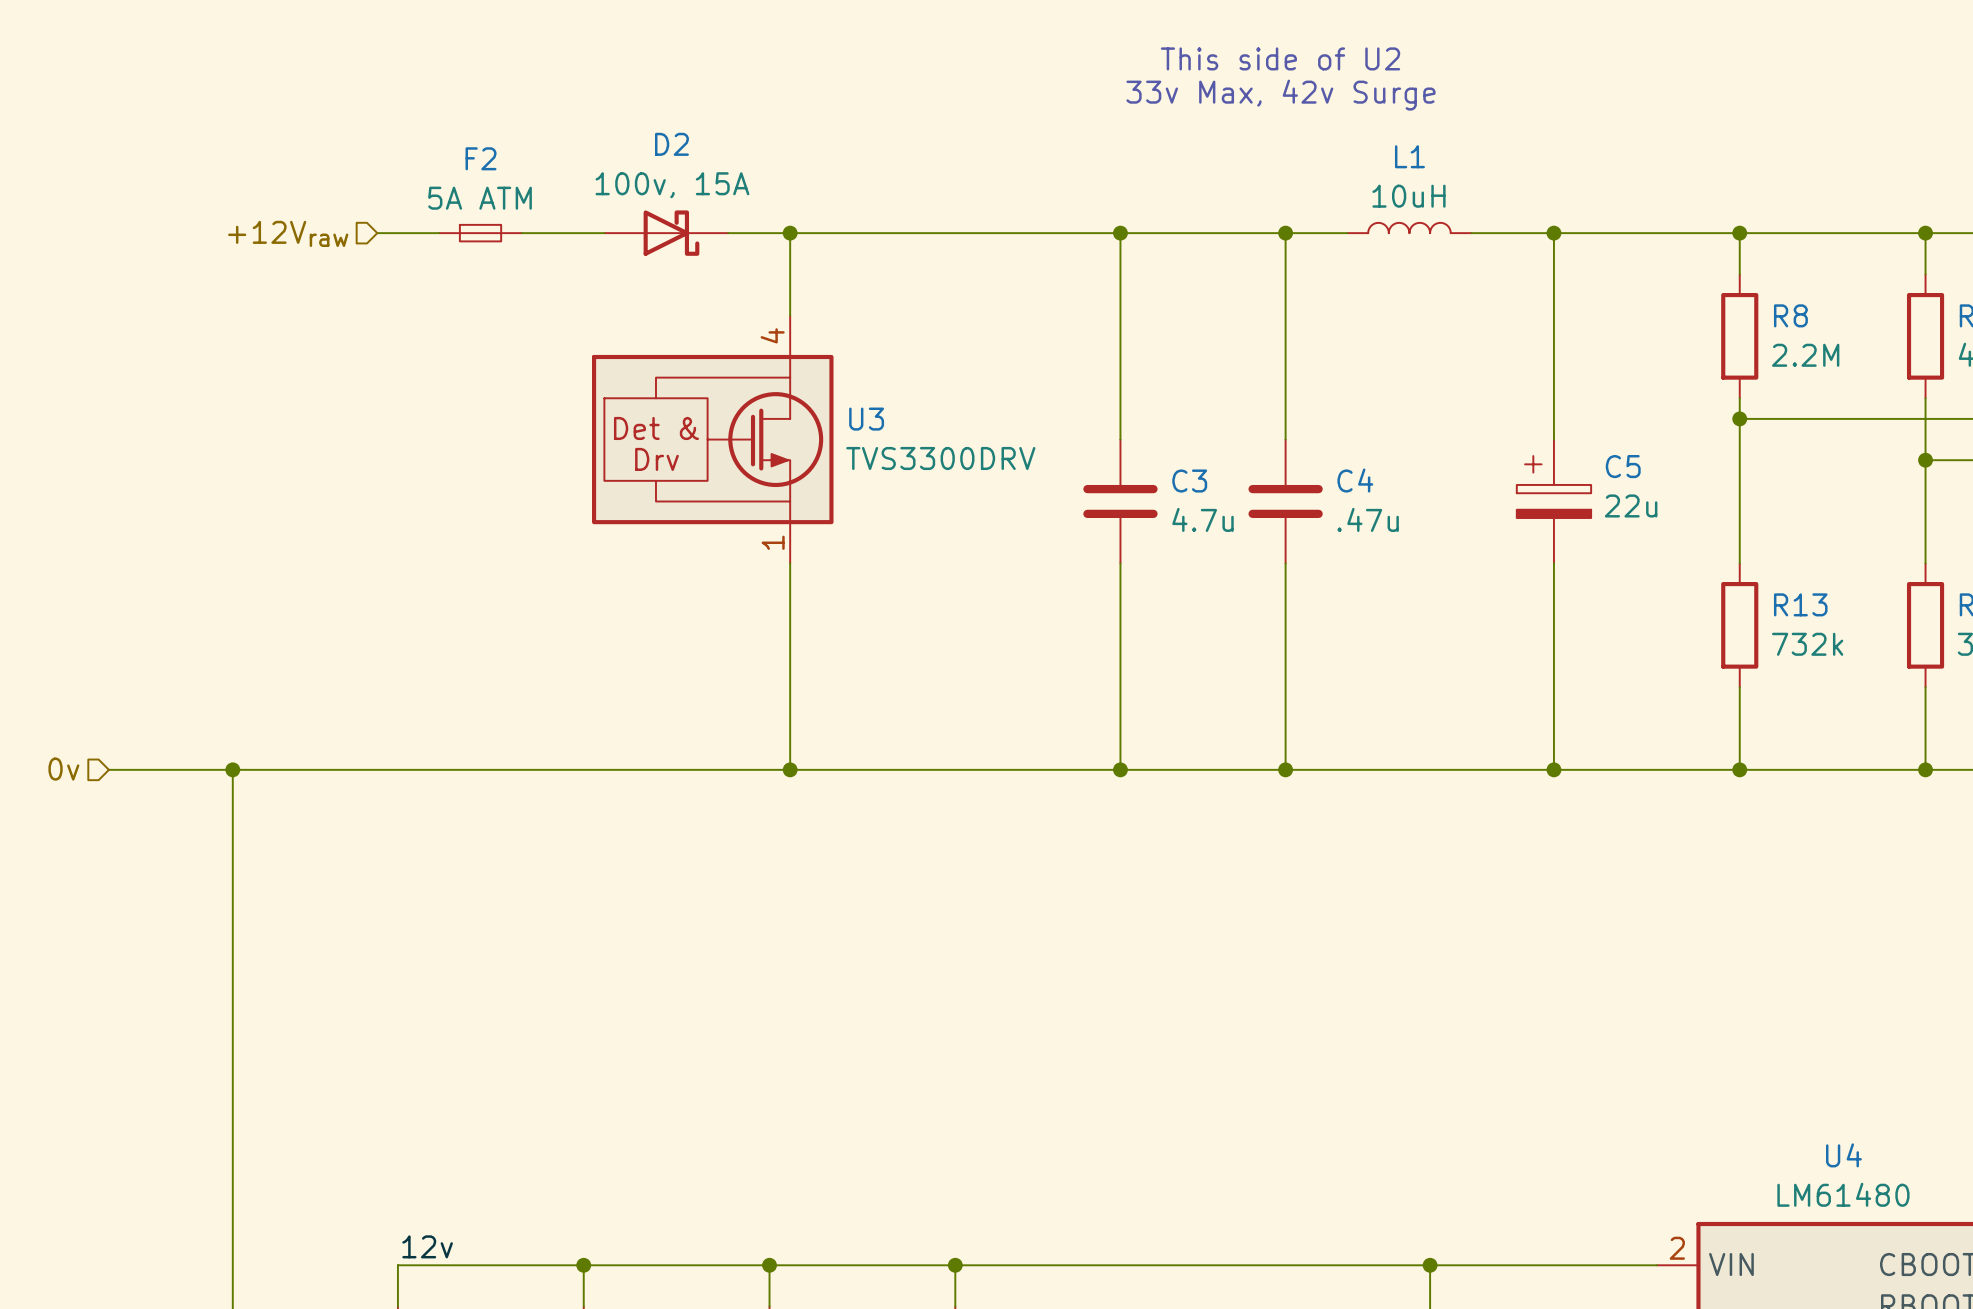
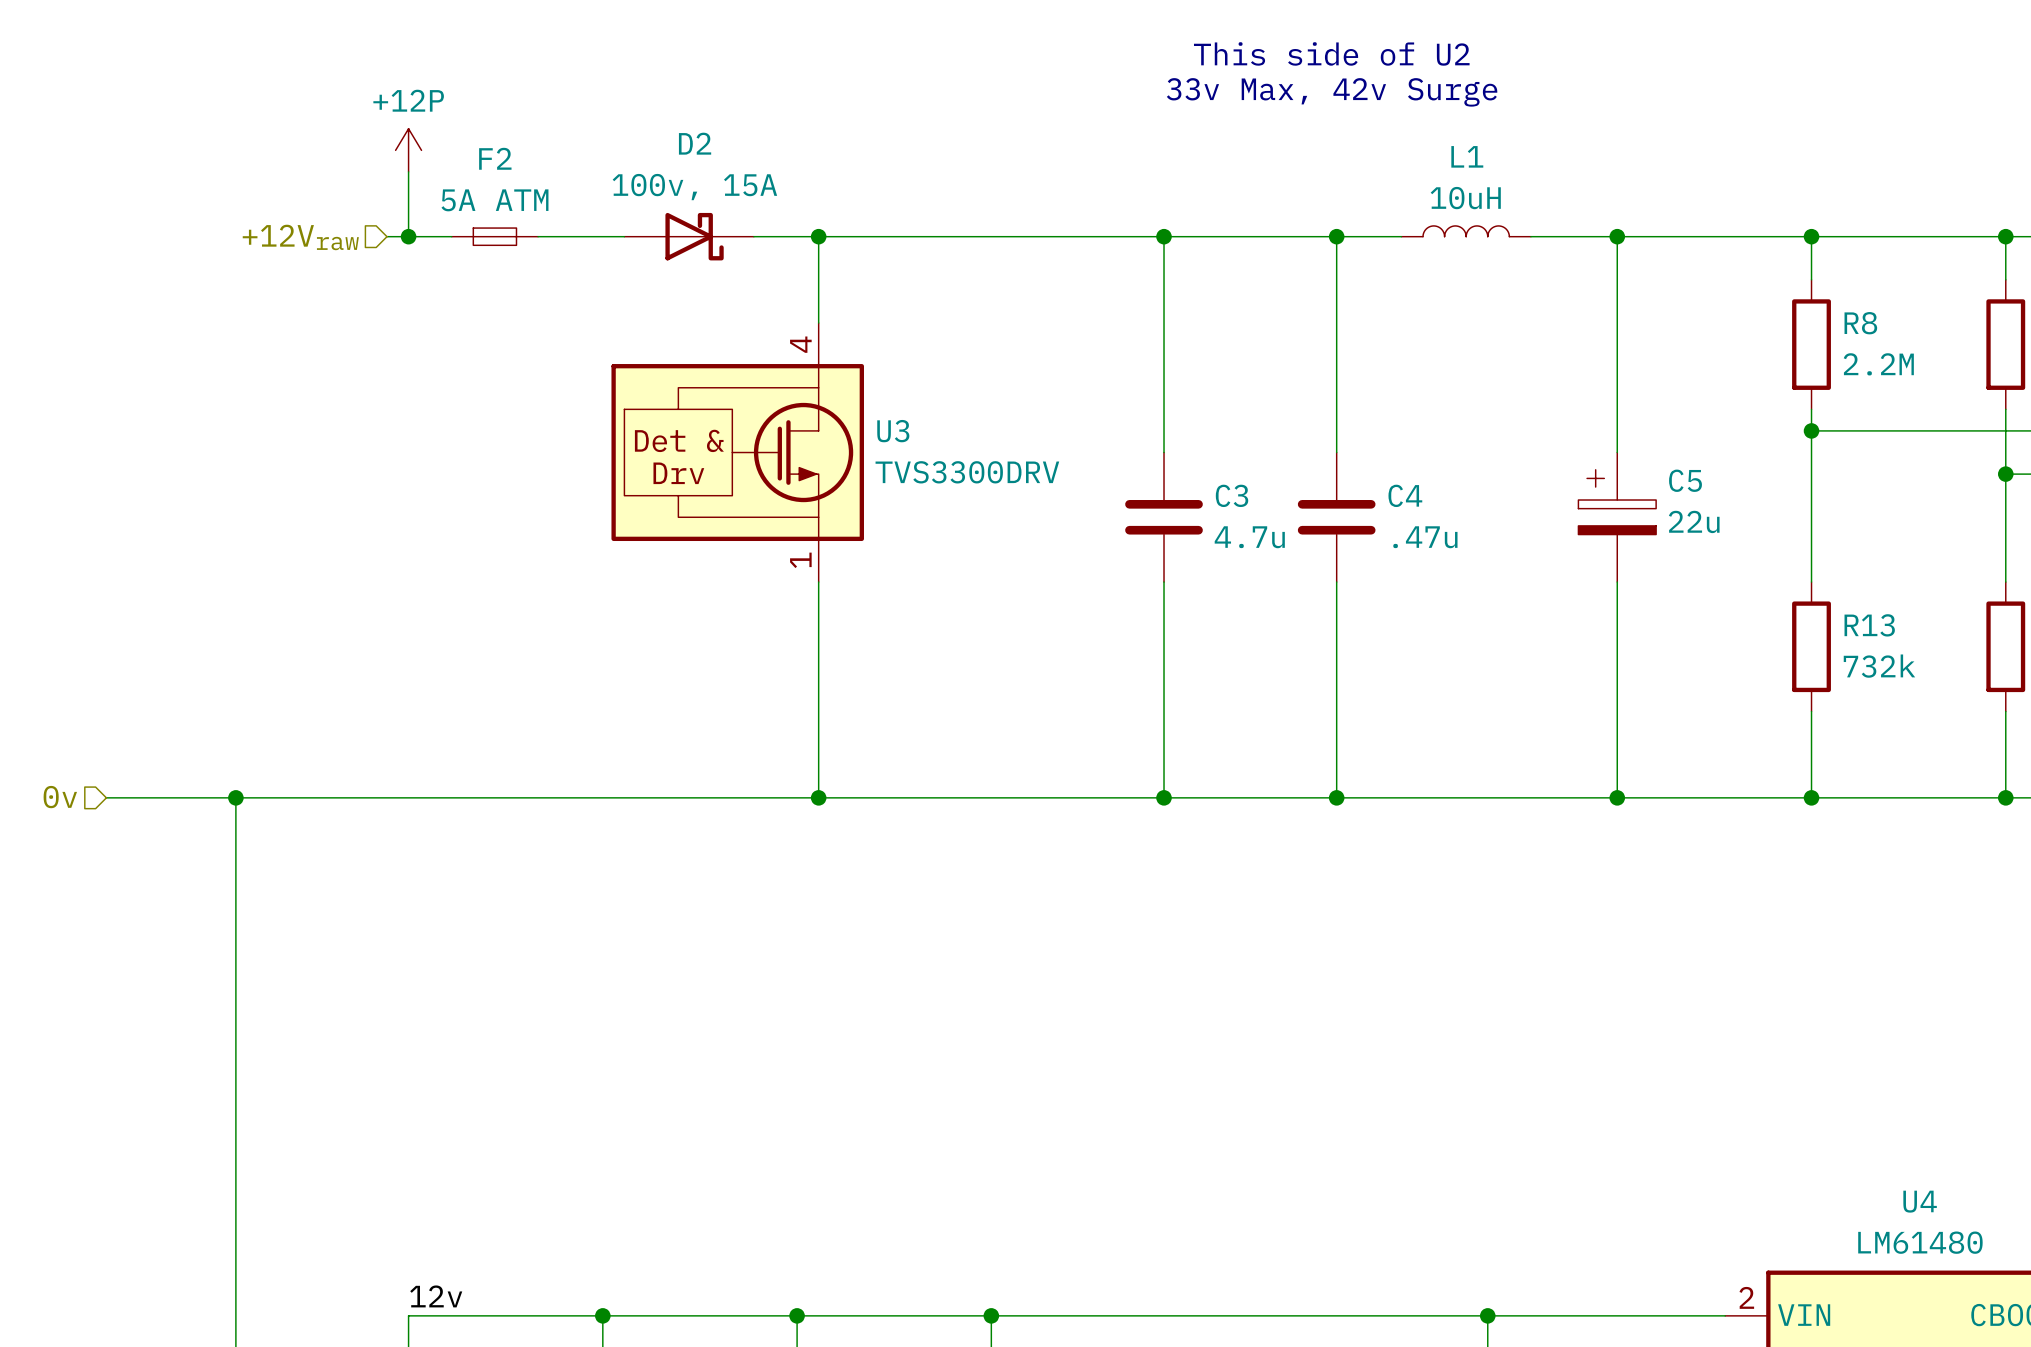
power symbol: none -> +12P (408, 150)
wire: none -> (408, 171) (408, 236)
junction: none -> (408, 236)

